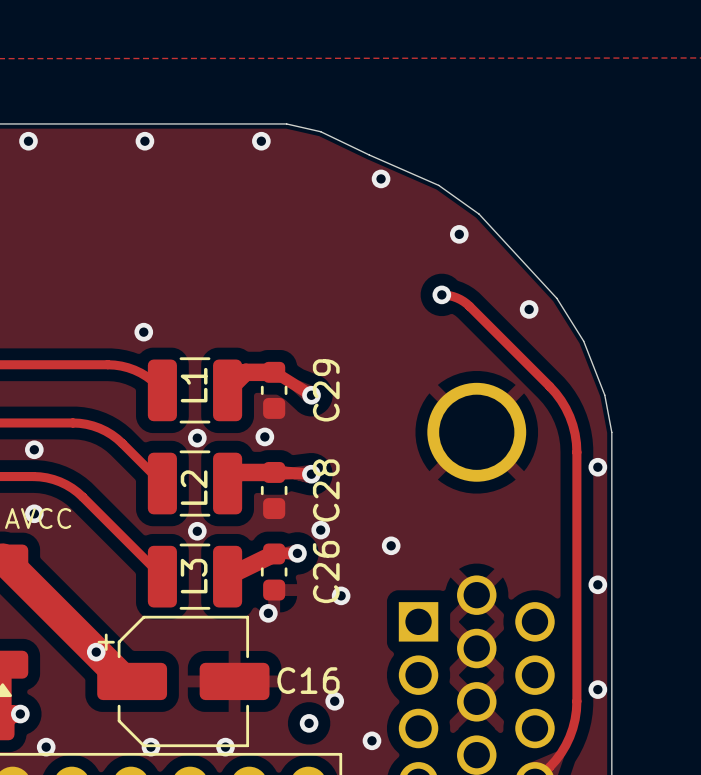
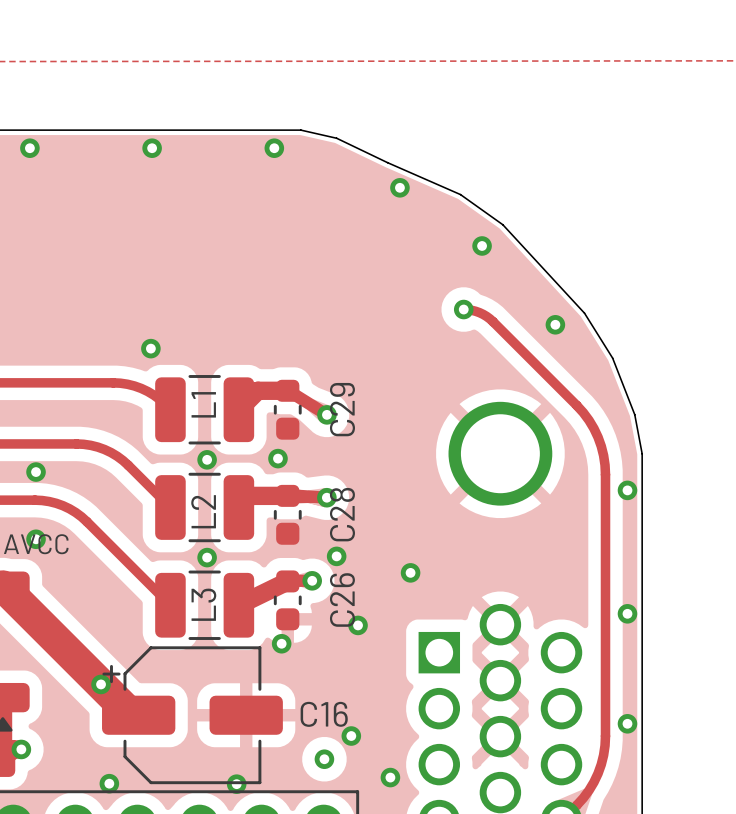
via: none -> (109, 783)
via: (46, 747) -> none
via: (150, 747) -> none

